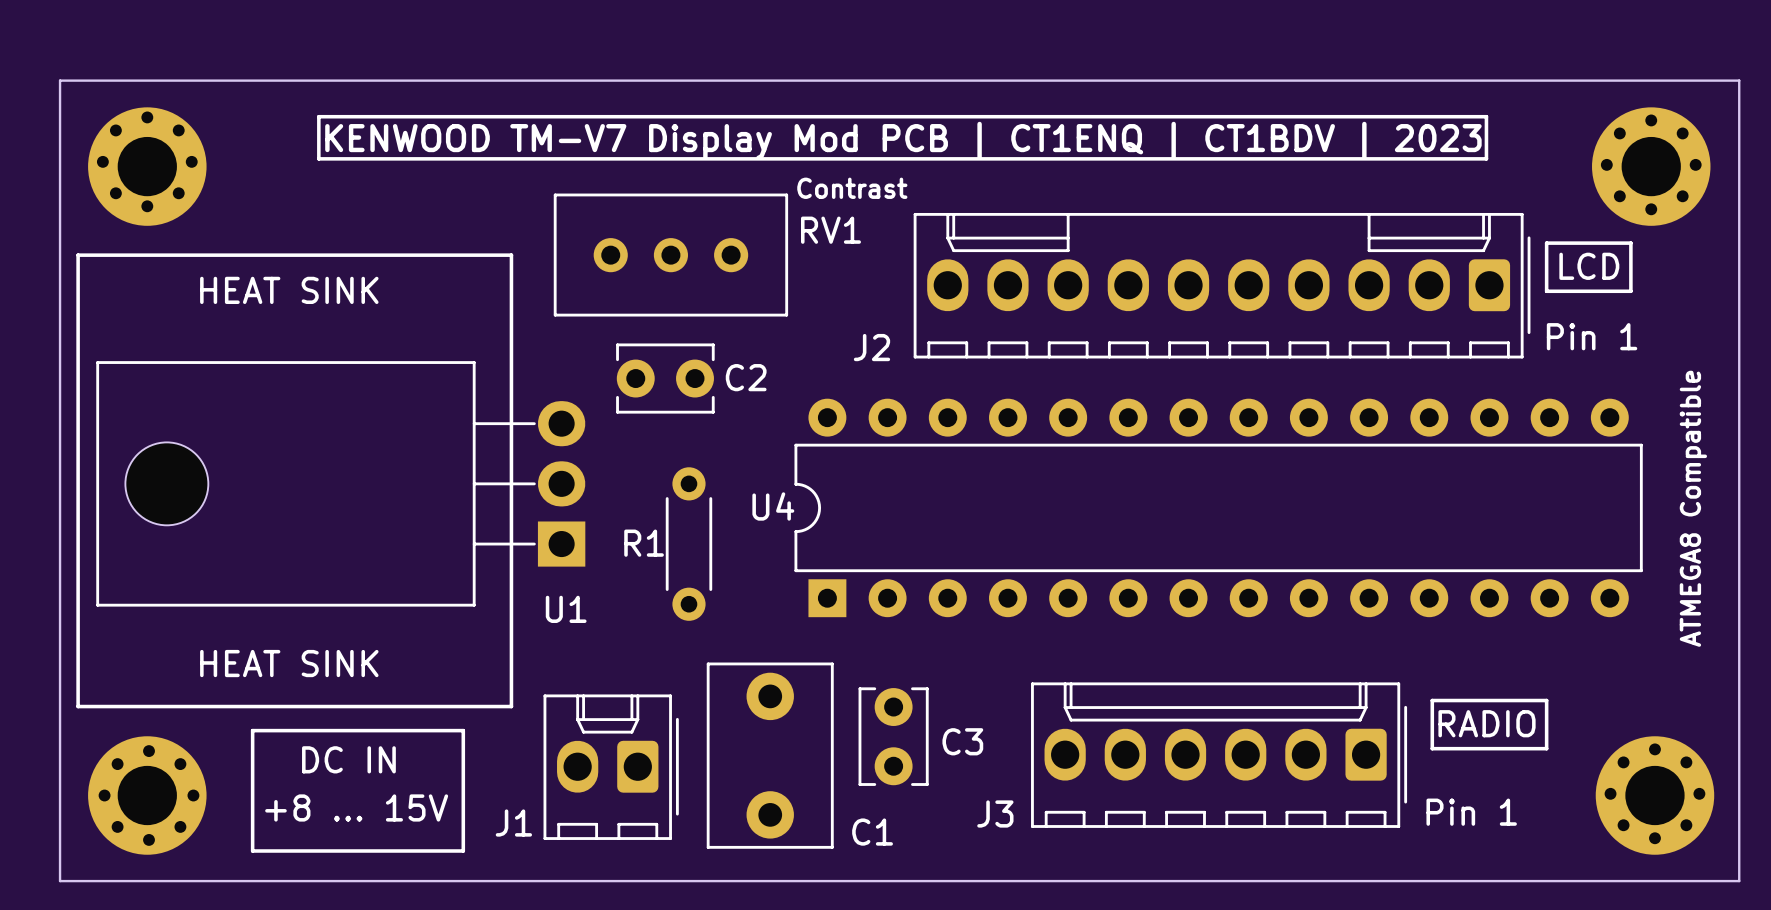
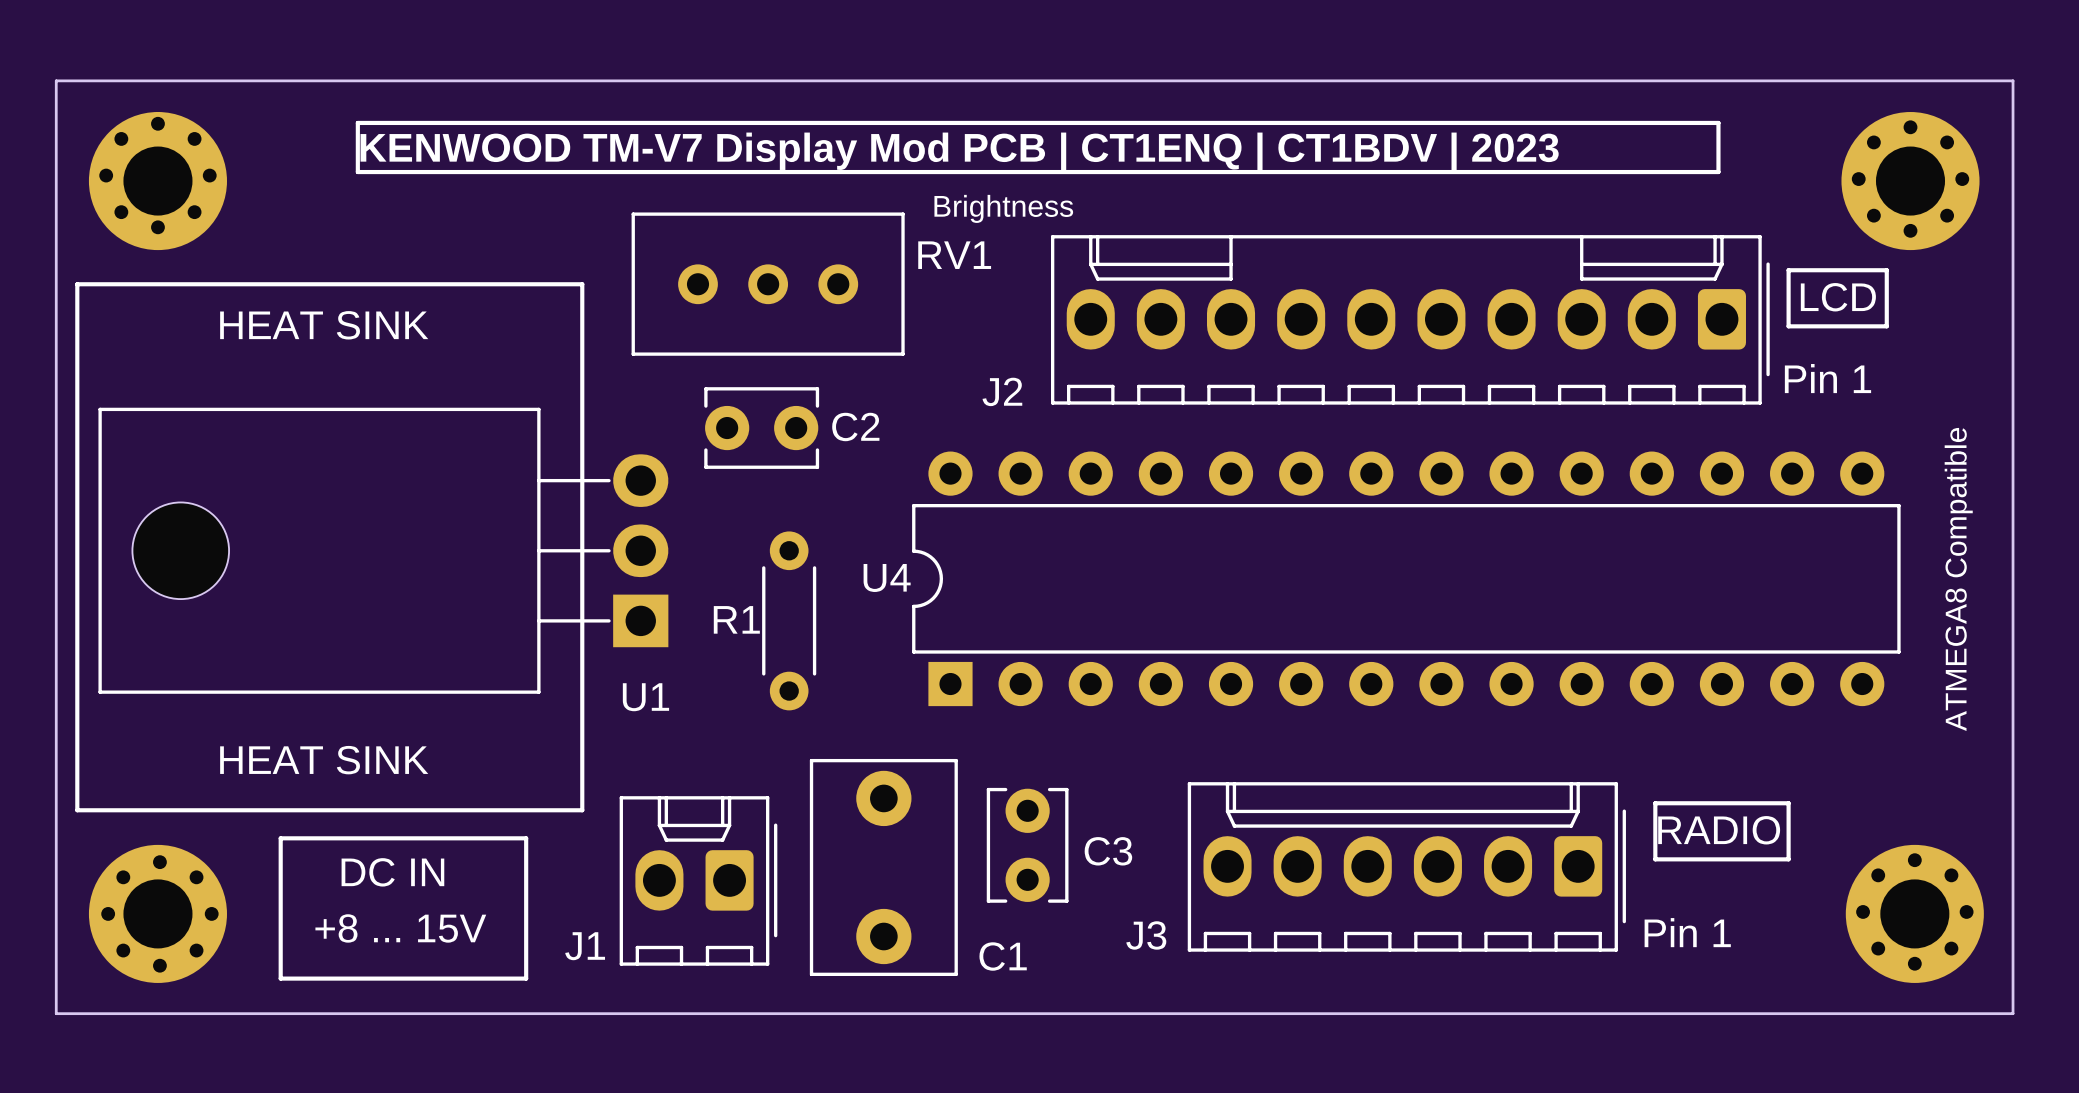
text: Contrast (852, 188) -> Brightness (1003, 208)

